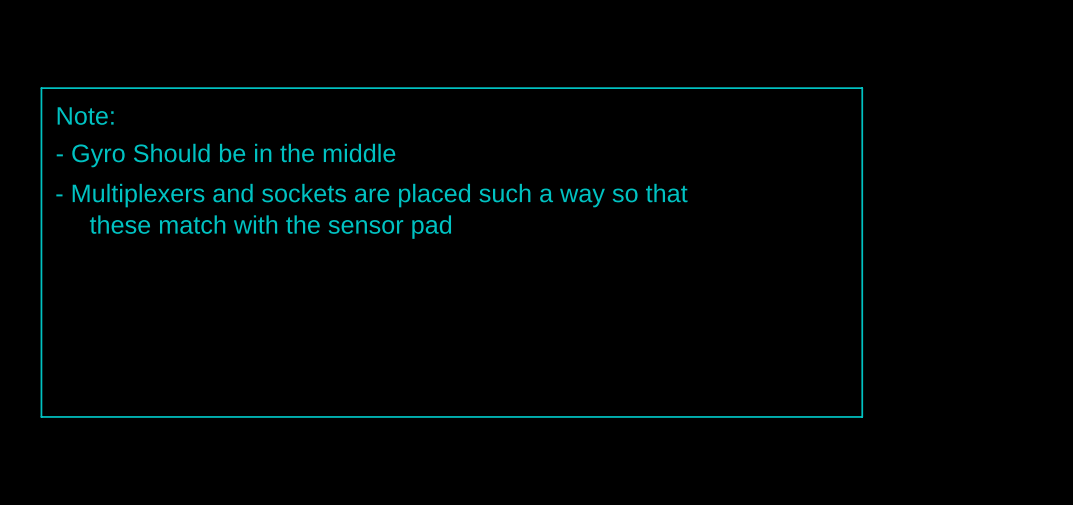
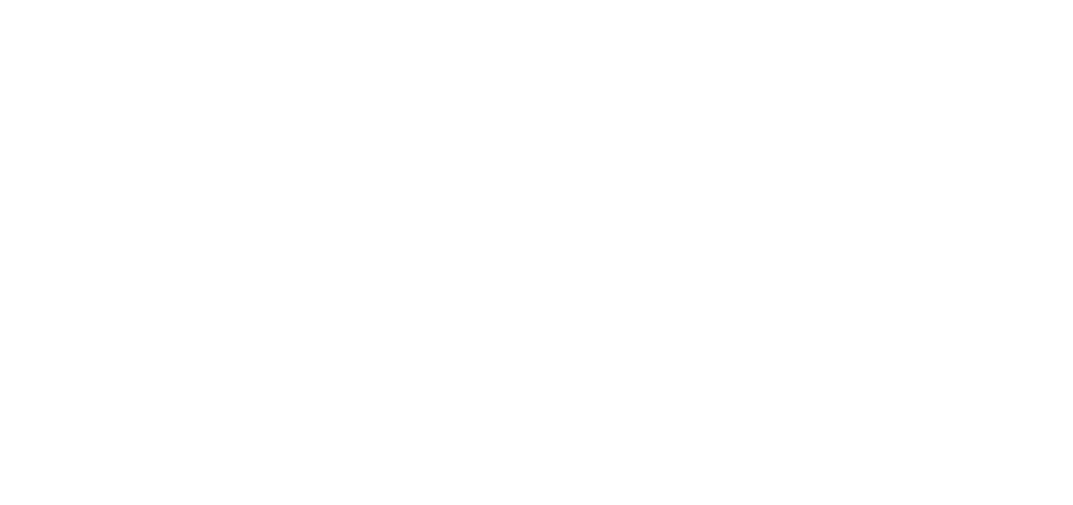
line: (41, 88) (862, 88) (862, 416) (41, 416) (41, 88) -> none
text: Note: (85, 116) -> none
text: - Gyro Should be in the middle (225, 155) -> none
text: - Multiplexers and sockets are placed such a way so that (371, 195) -> none
text: these match with the sensor pad (270, 227) -> none

